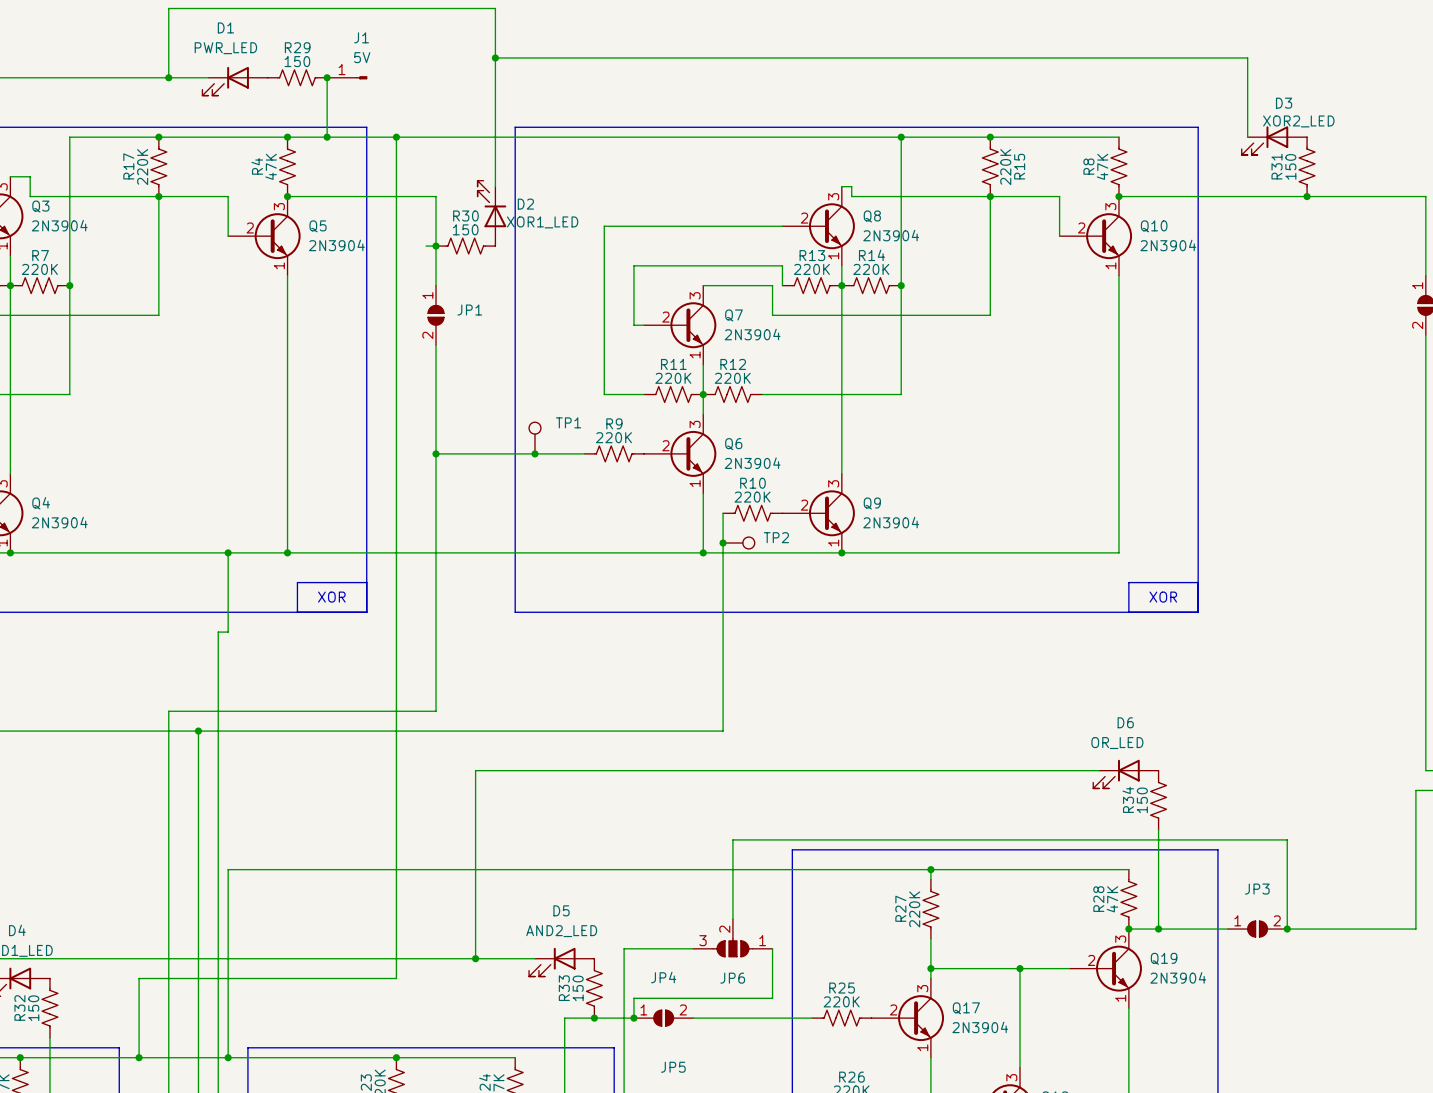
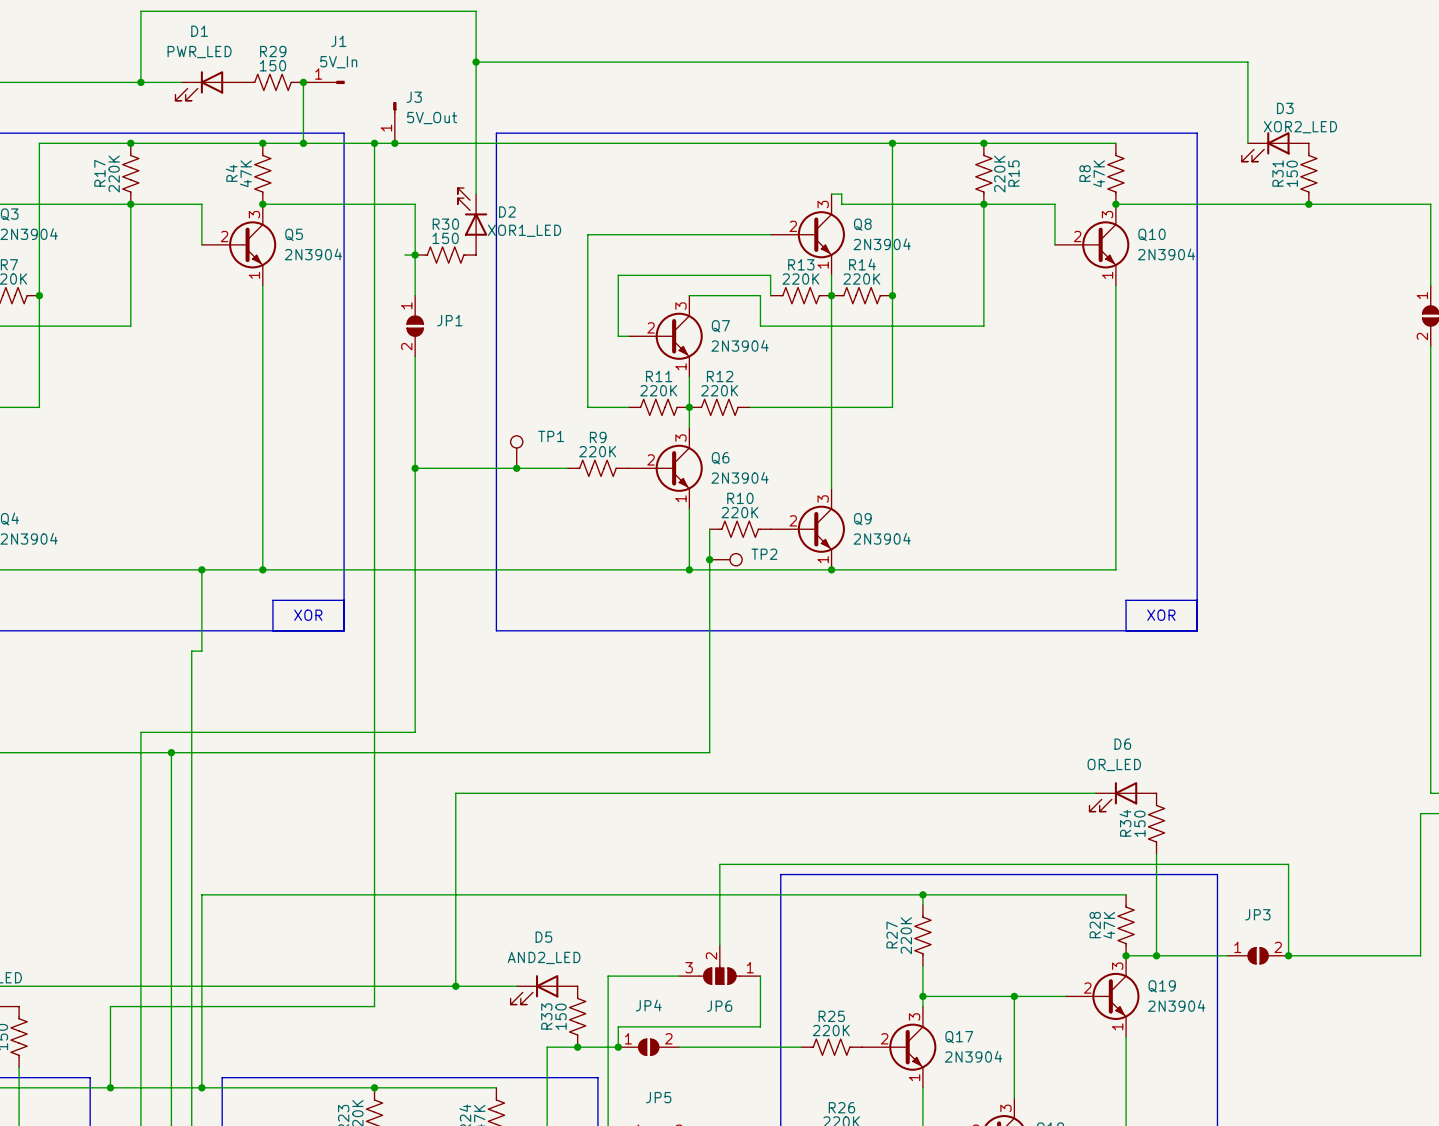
J1 value: 5V (362, 57) -> 5V_In (338, 62)
J3: none -> 5V_Out (394, 122)
junction: none -> (394, 143)

